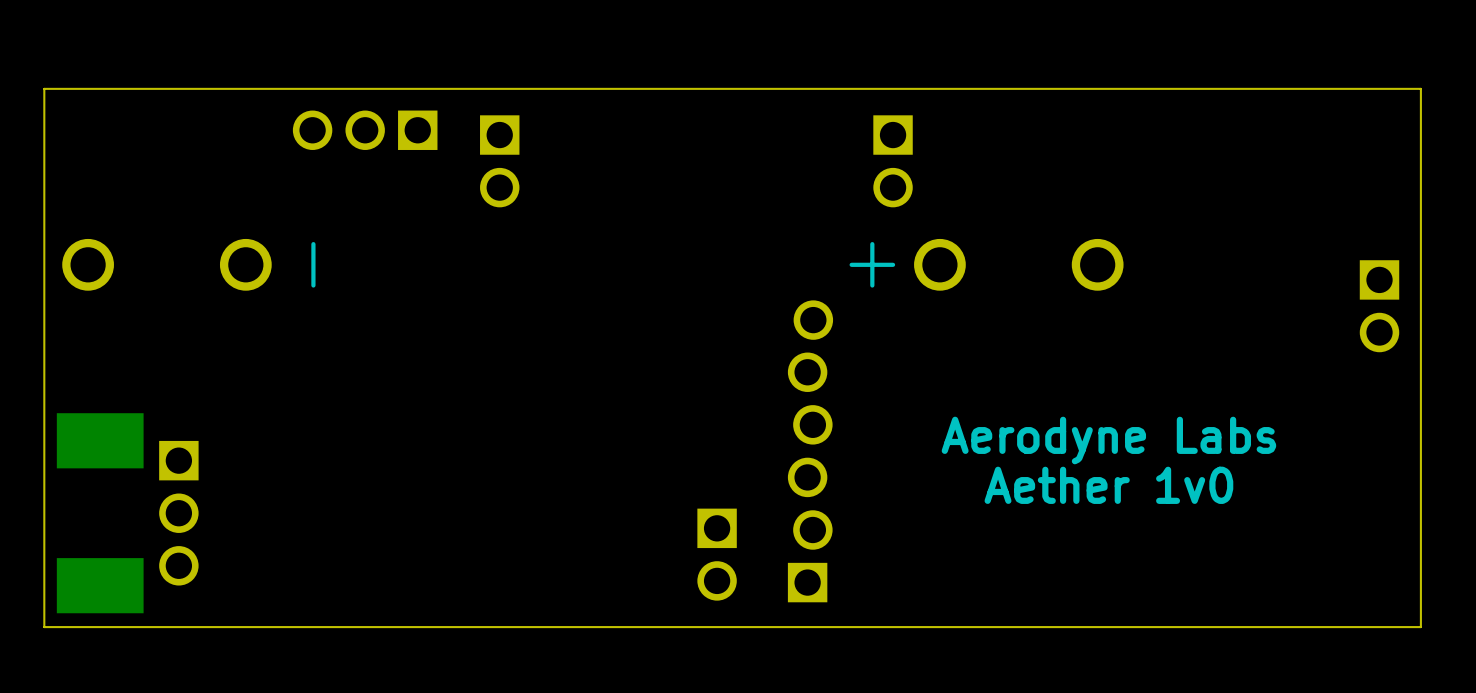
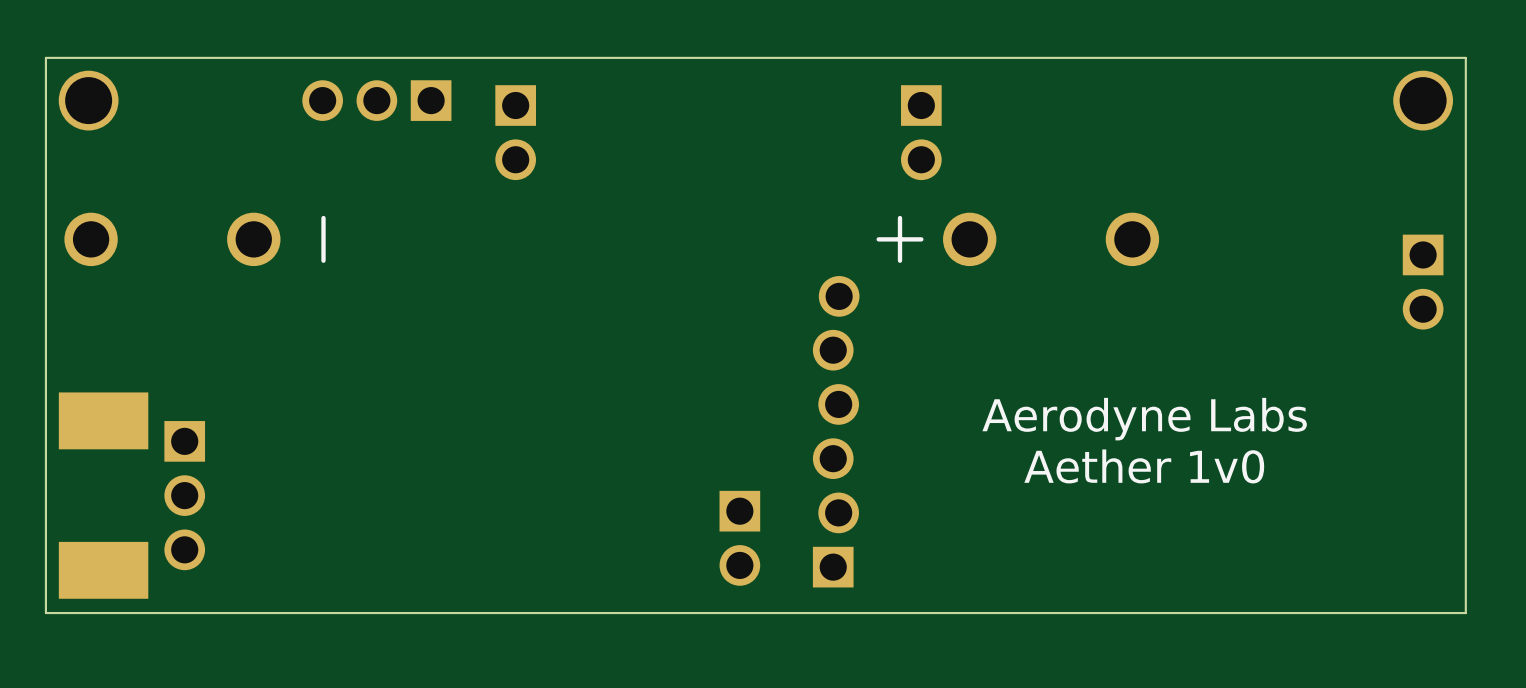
part: none -> (88, 100)
part: none -> (1423, 100)

